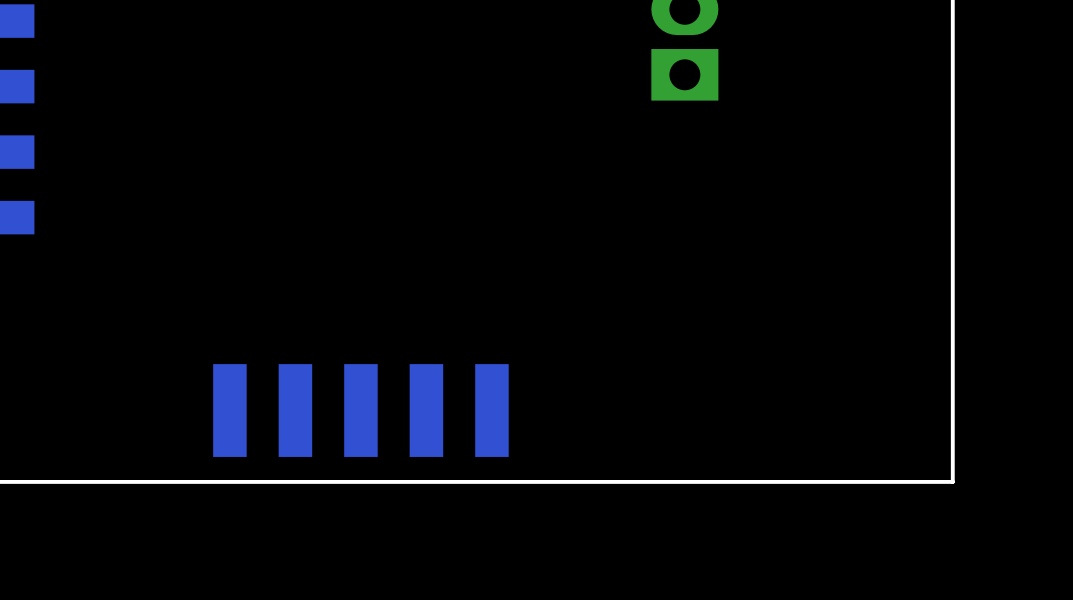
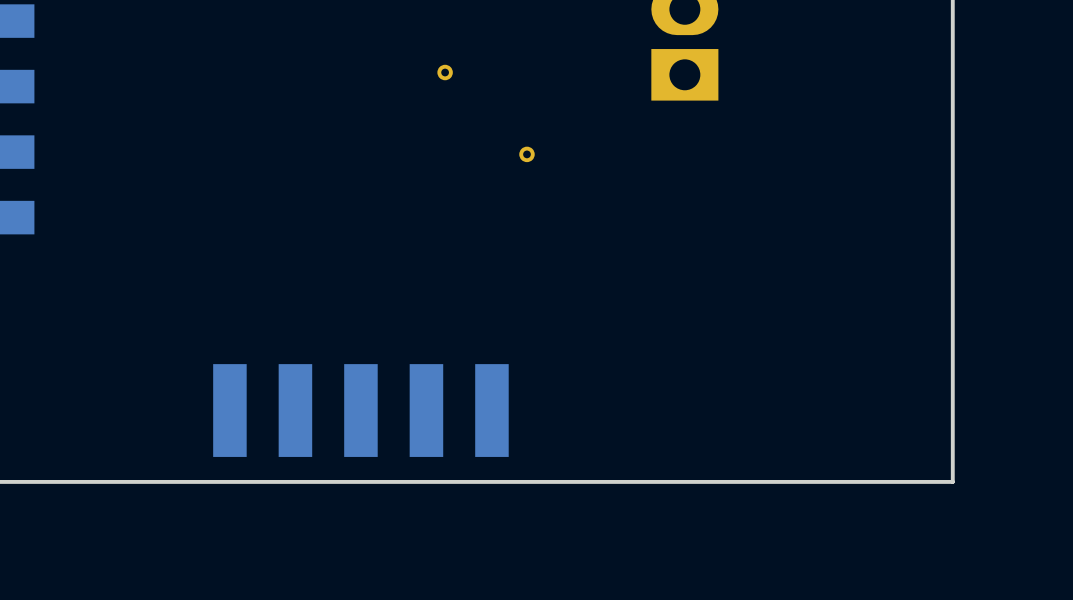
part: none -> (445, 72)
part: none -> (526, 154)

